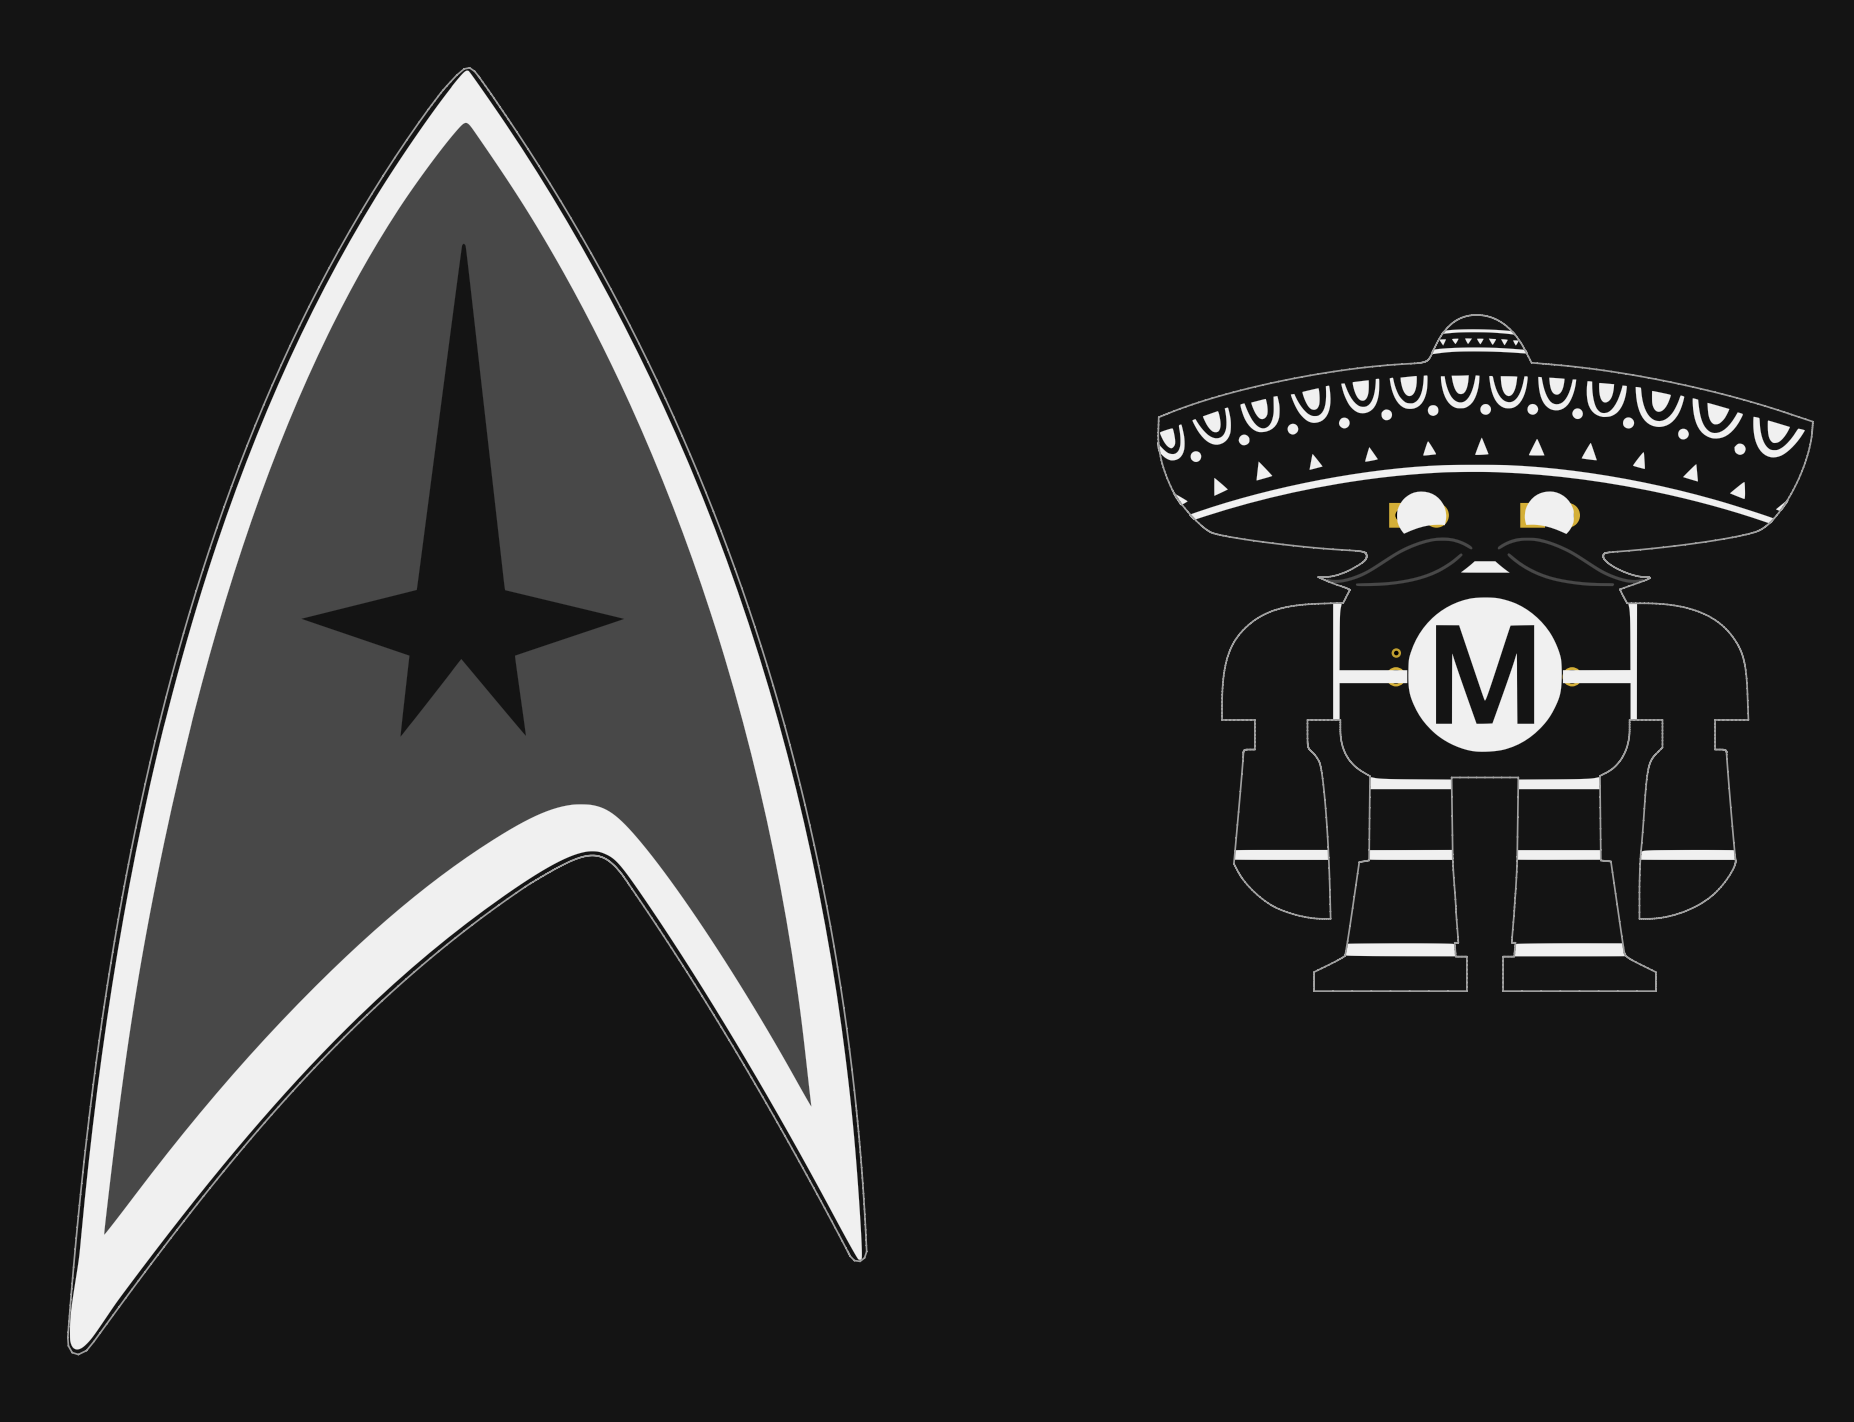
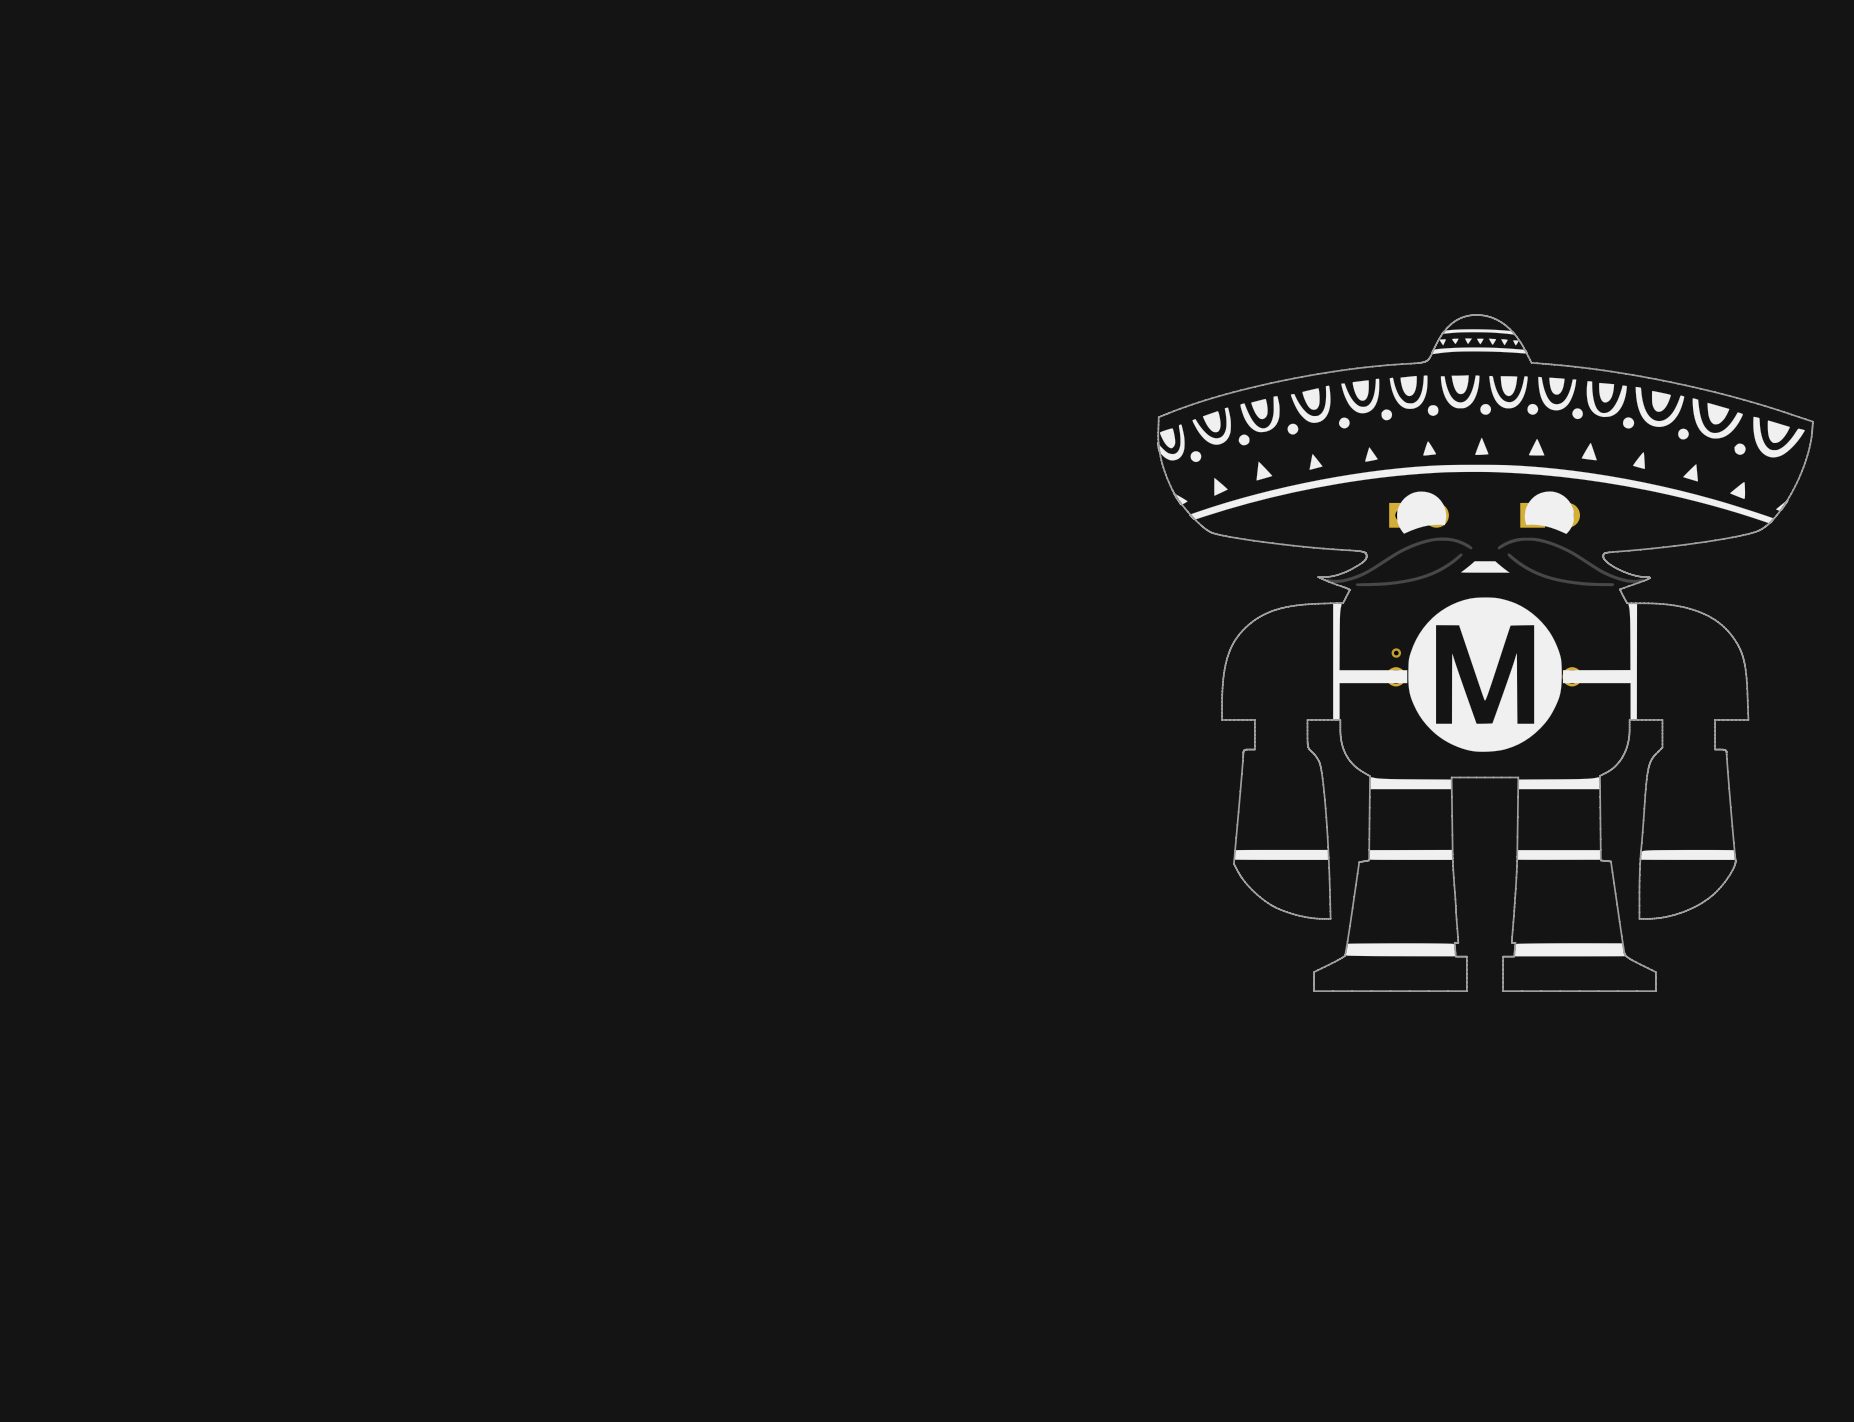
drawing: [67, 67, 868, 1356] -> none

